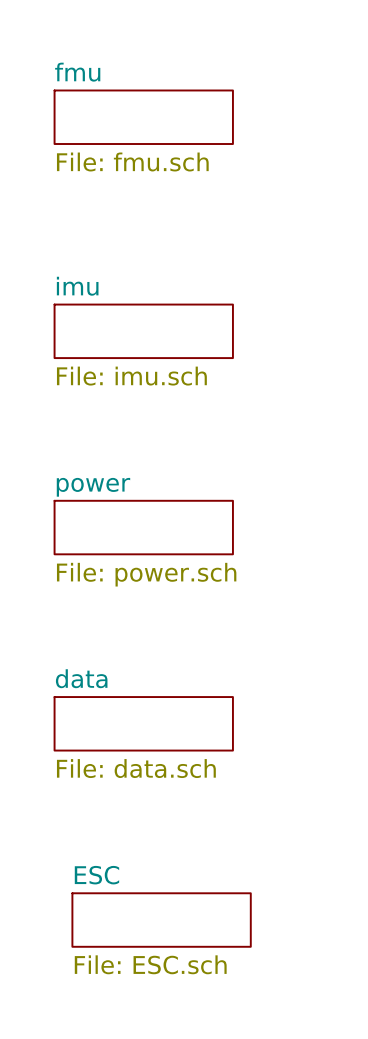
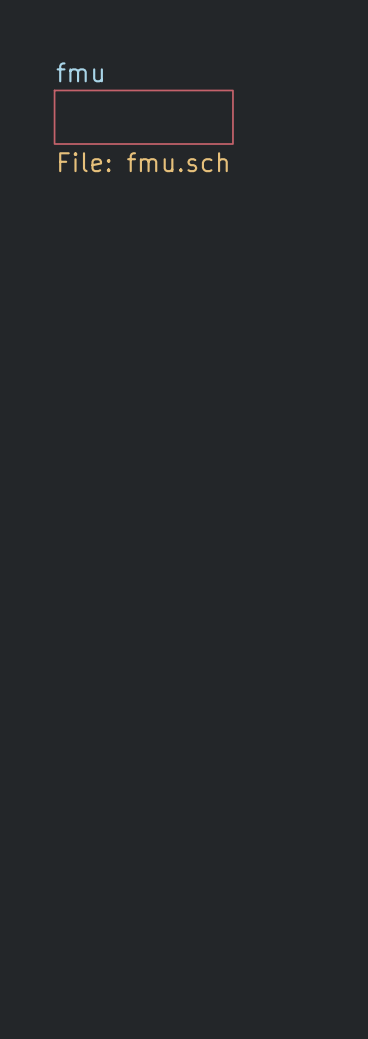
sheet imu: File: imu.sch (143, 331) -> none
sheet power: File: power.sch (143, 527) -> none
sheet data: File: data.sch (143, 723) -> none
sheet ESC: File: ESC.sch (161, 920) -> none

